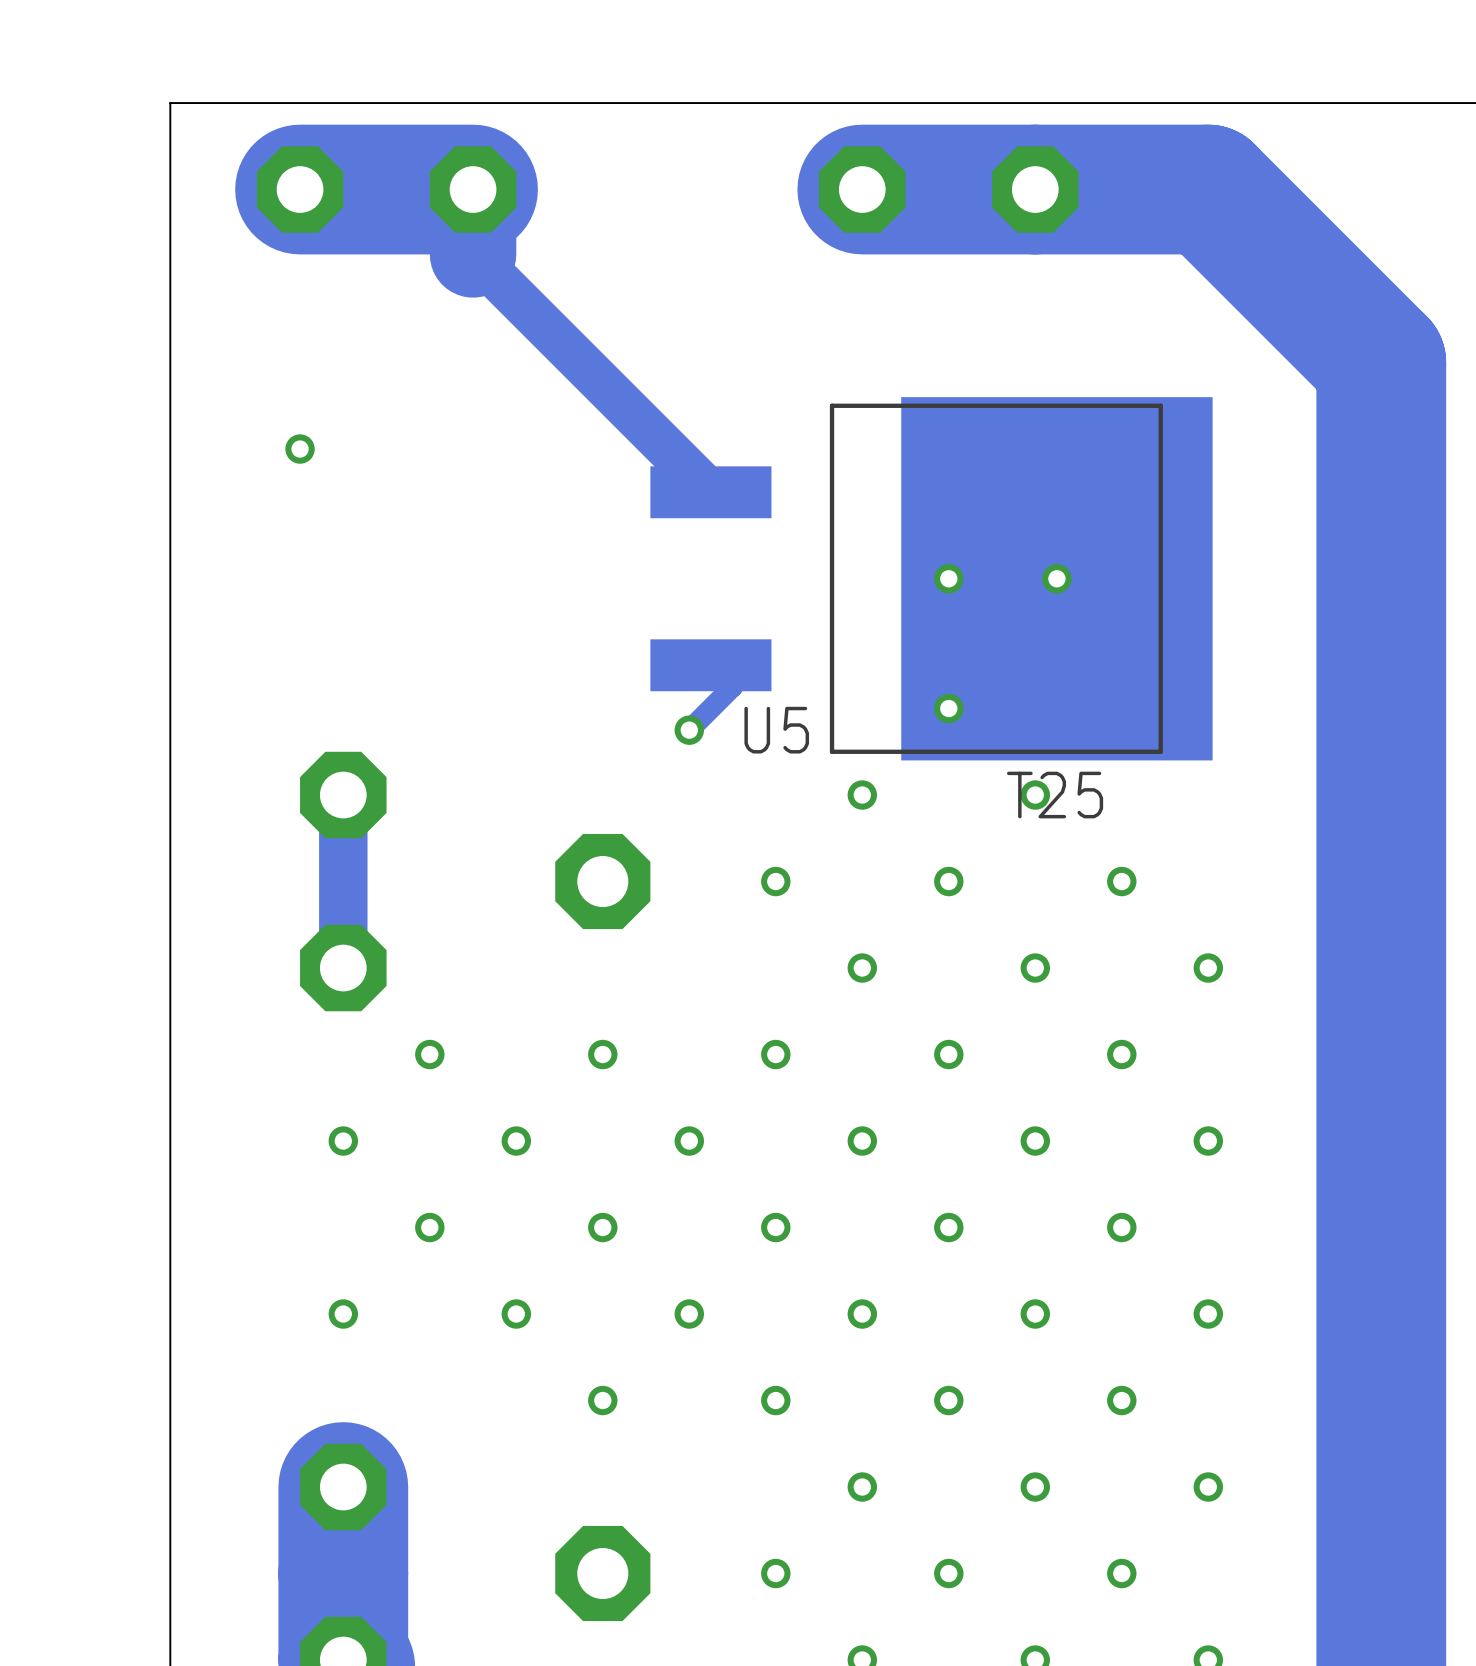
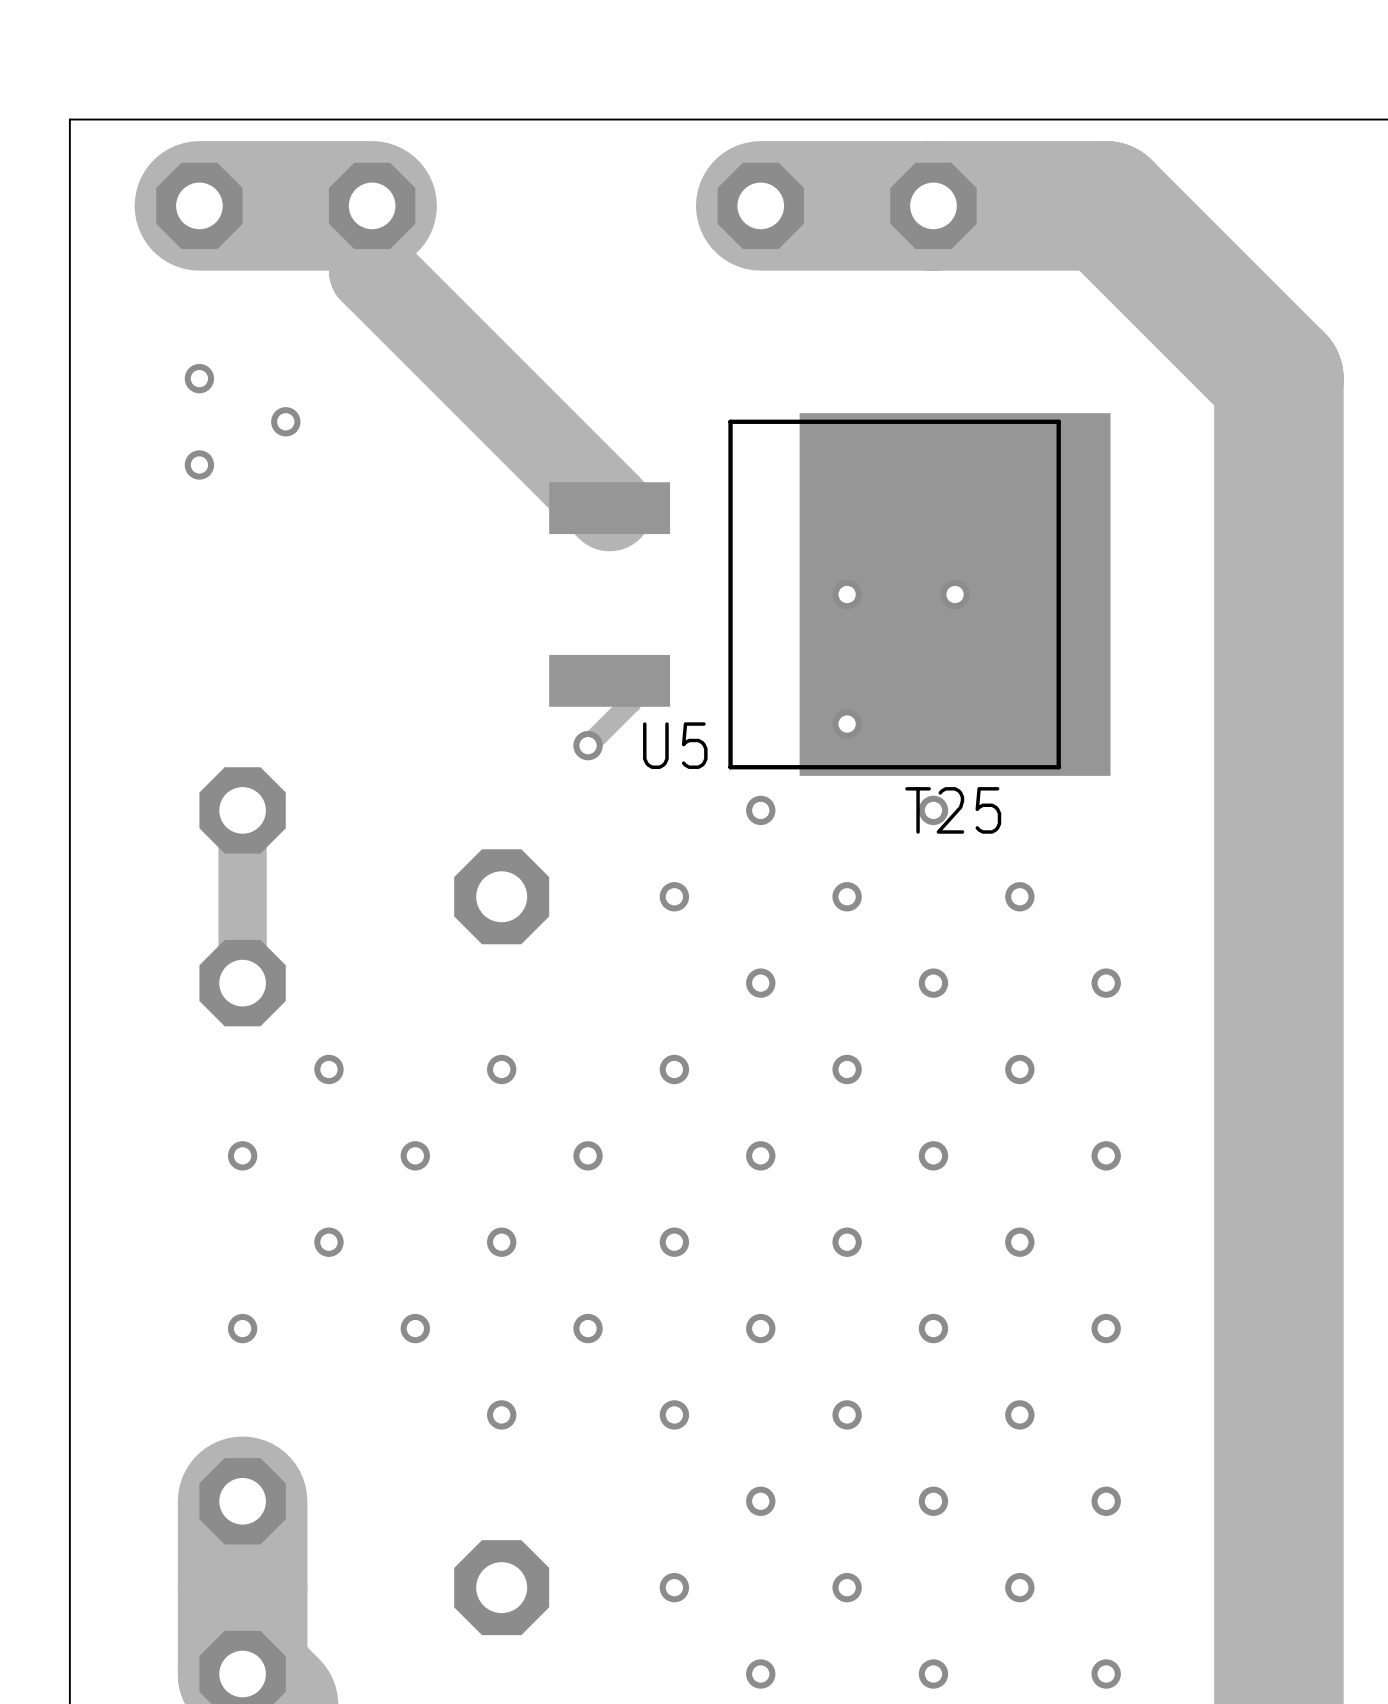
track width: thin (473, 254) (710, 492) -> thick (372, 270) (609, 508)
via: none -> (199, 378)
via: none -> (285, 421)

